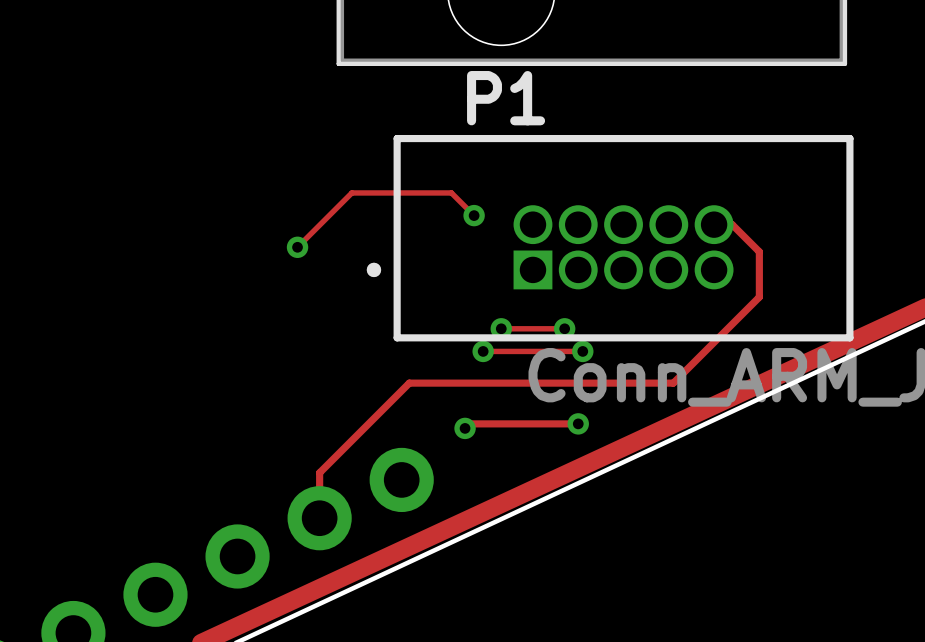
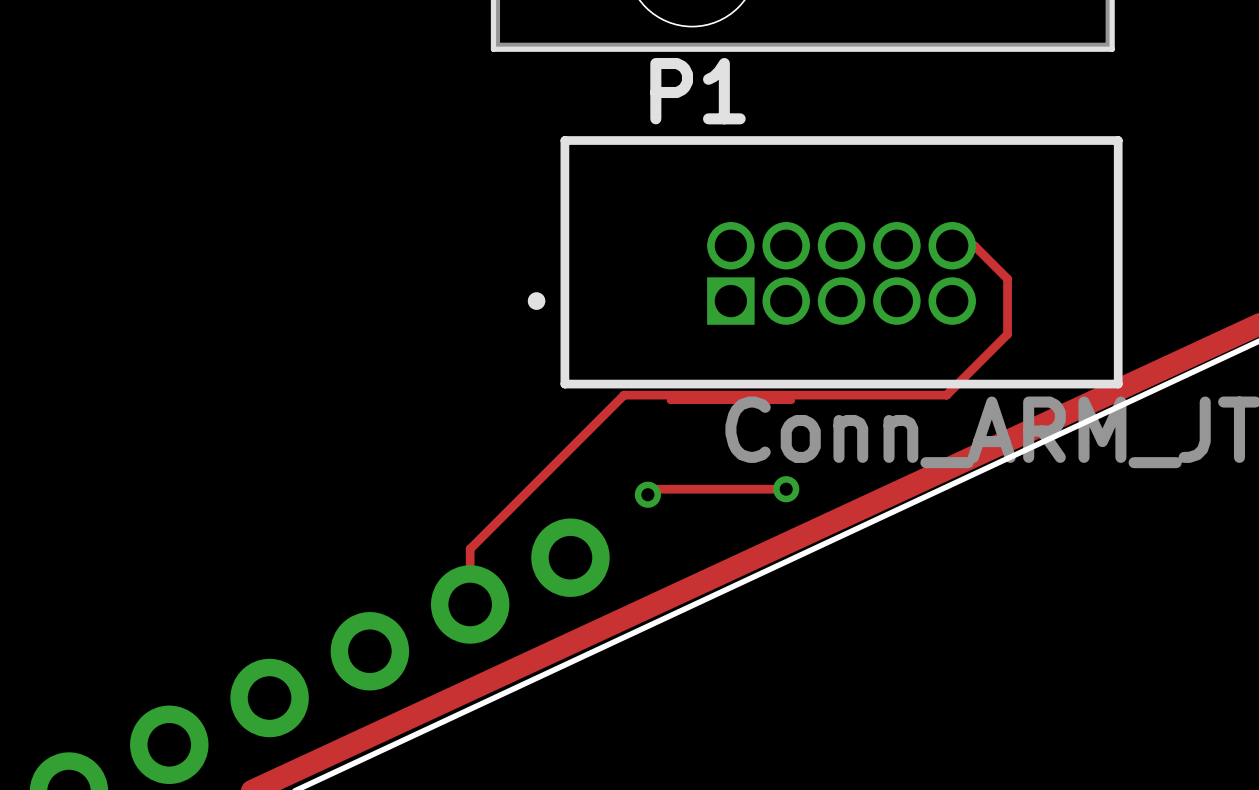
track: (474, 215) (451, 192) (351, 192) (297, 247) -> none
via: (474, 215) -> none
via: (297, 247) -> none
track: (501, 328) (564, 328) -> none
via: (501, 328) -> none
via: (564, 328) -> none
track: (709, 346) (673, 383) (409, 383) -> (946, 395) (624, 395) (579, 439)
via: (483, 351) -> none
via: (582, 351) -> none

